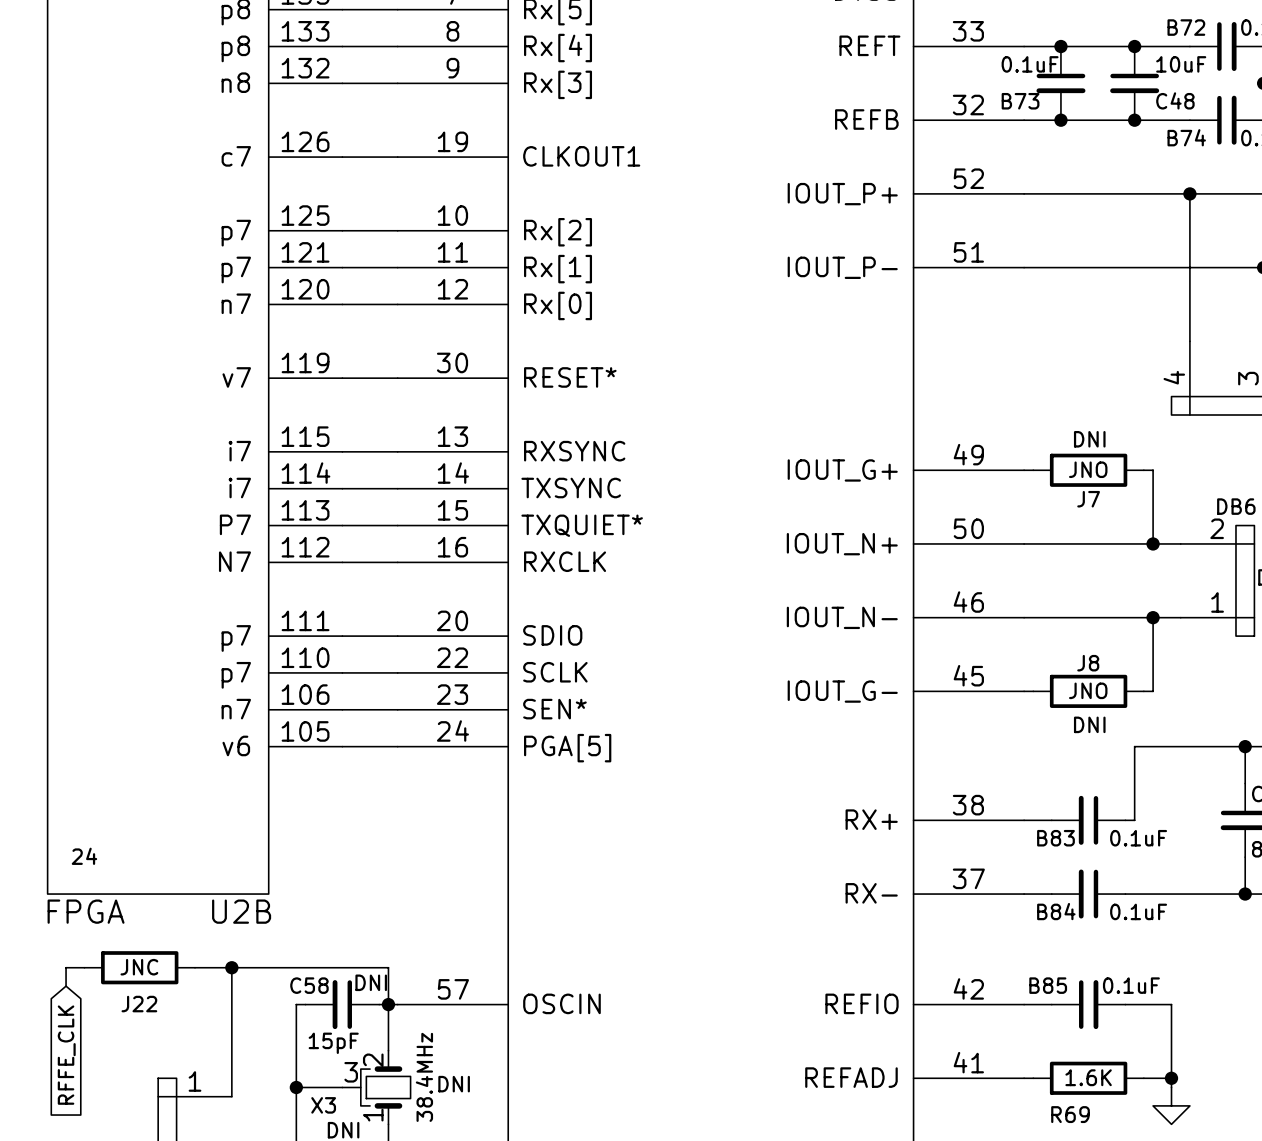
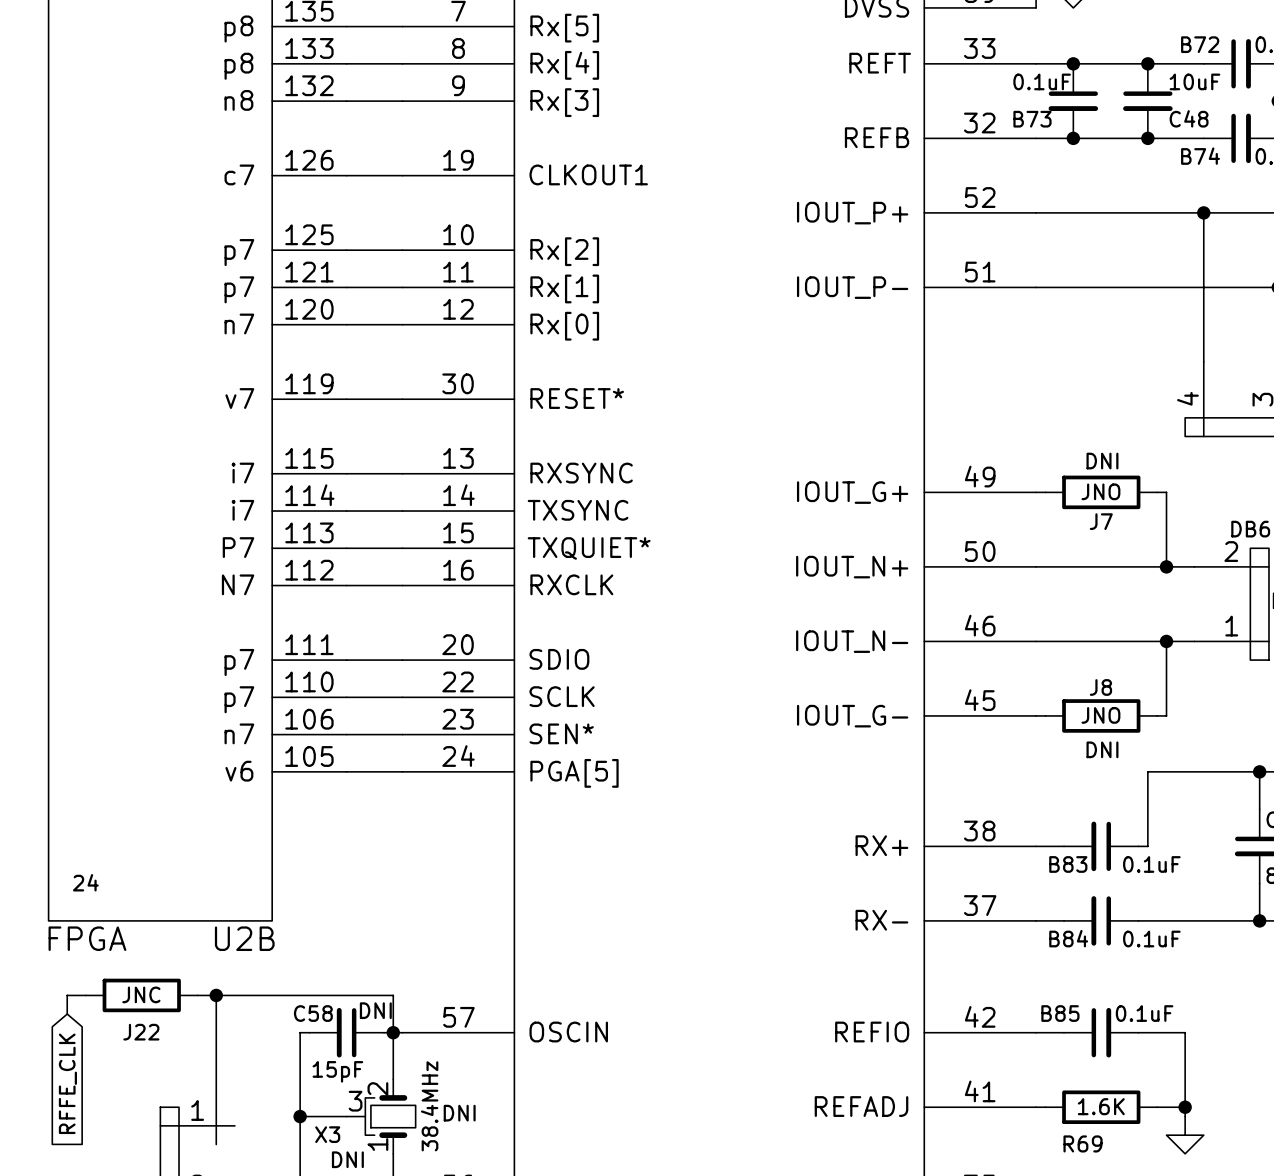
wire: none -> (216, 995) (216, 1144)
wire: (231, 967) (231, 1096) -> none
junction position: (231, 967) -> (216, 995)

